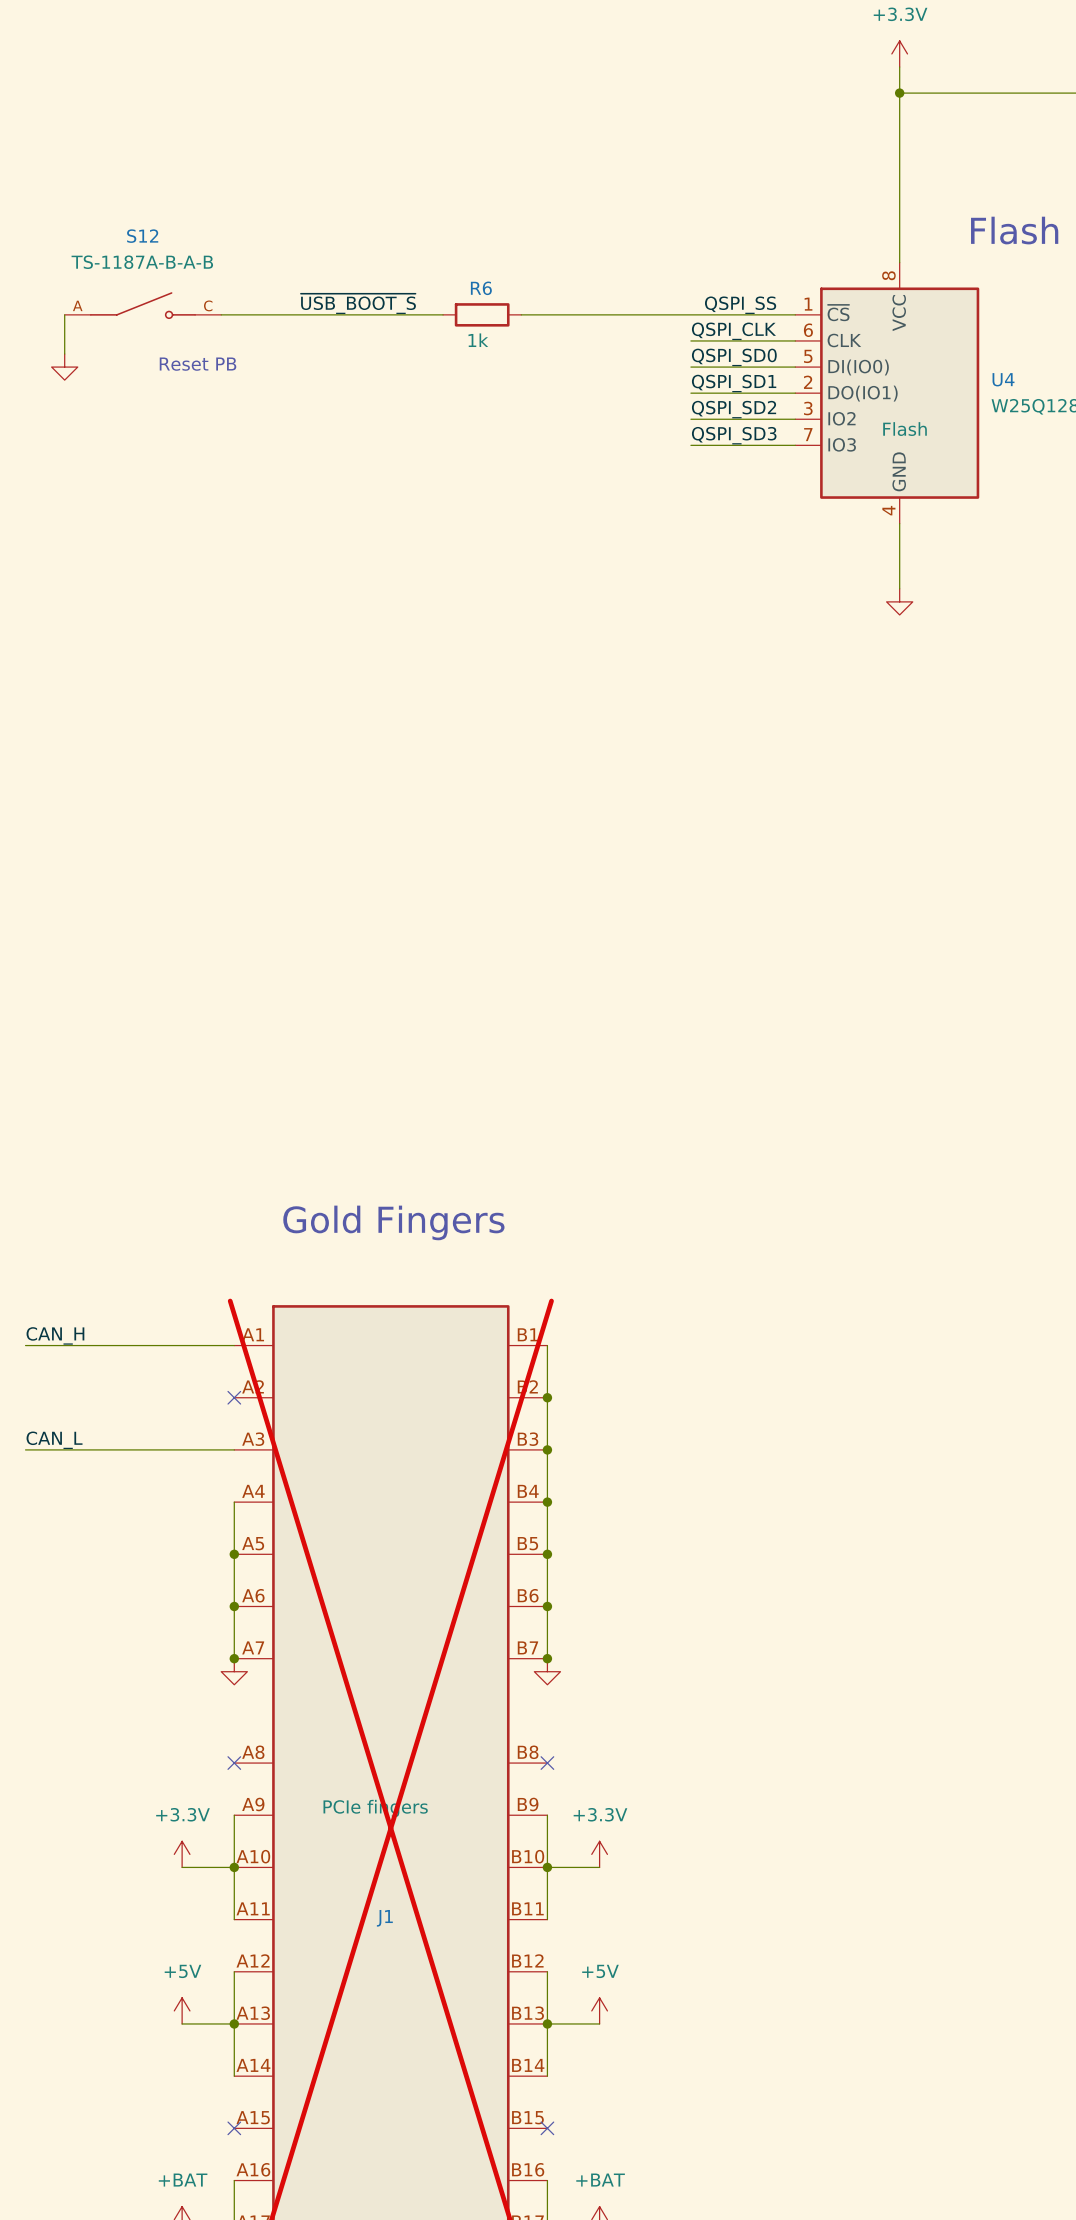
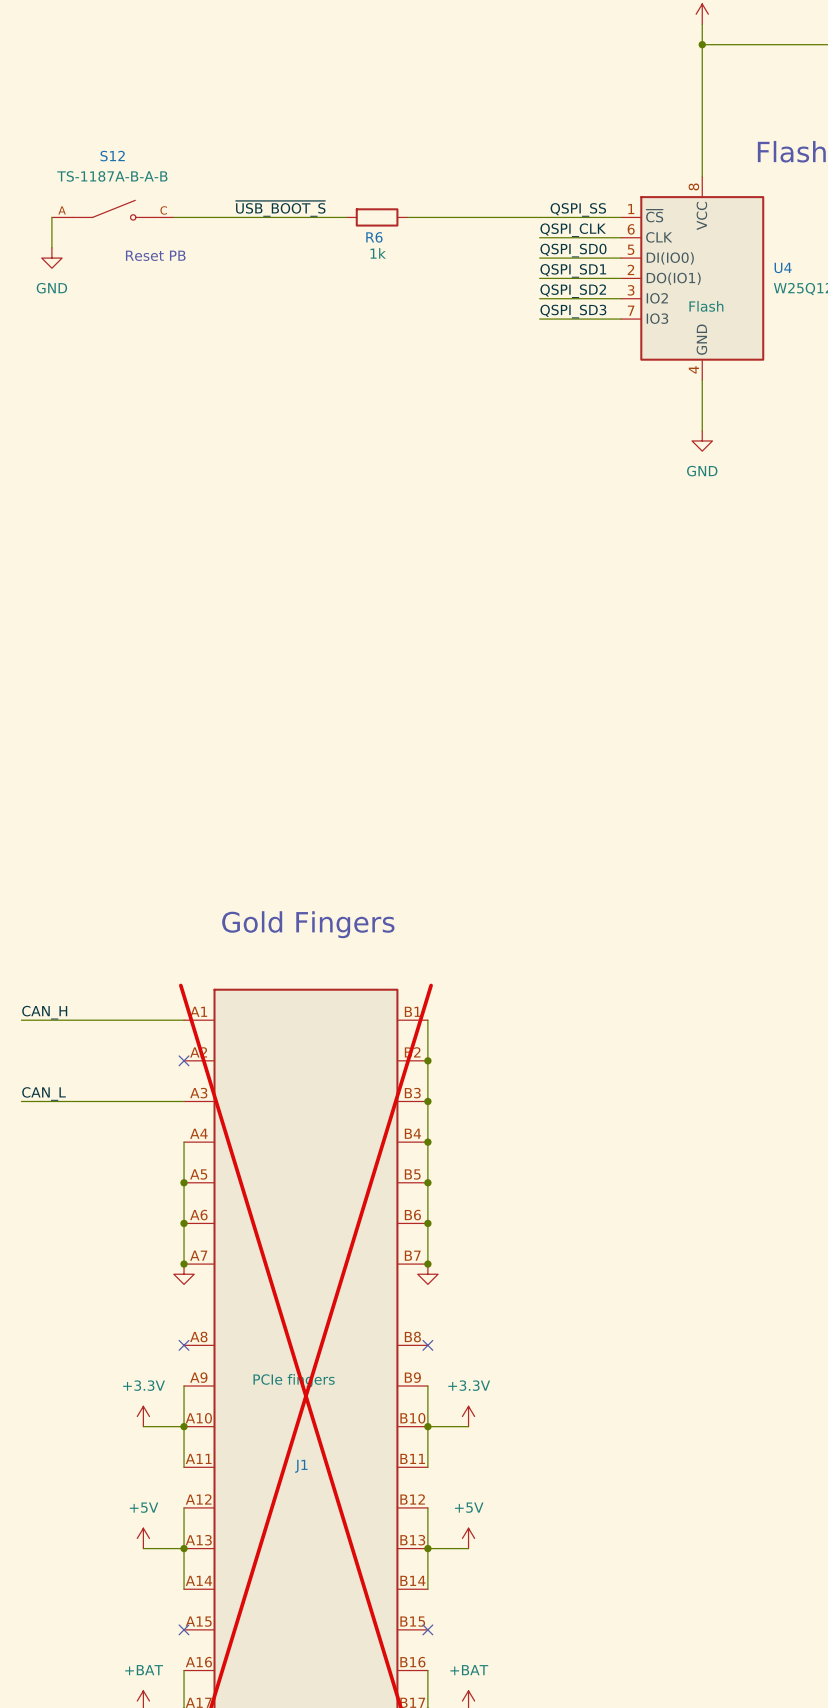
R6 name position: R6 (481, 288) -> R6 (374, 237)
R6 value position: 1k (478, 340) -> 1k (378, 253)
power symbol text: none -> GND (51, 288)
power symbol text: none -> GND (702, 471)

